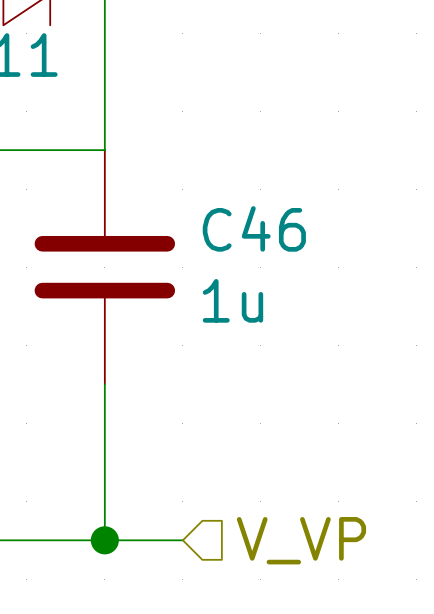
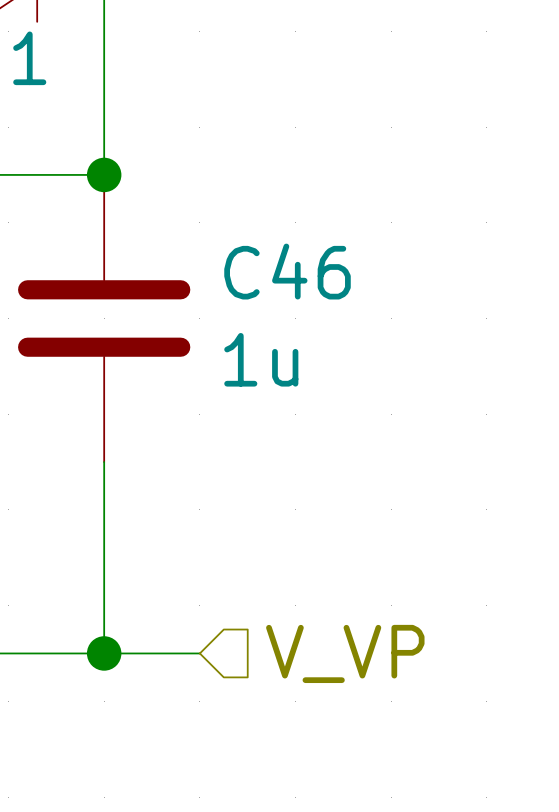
junction: none -> (104, 174)

